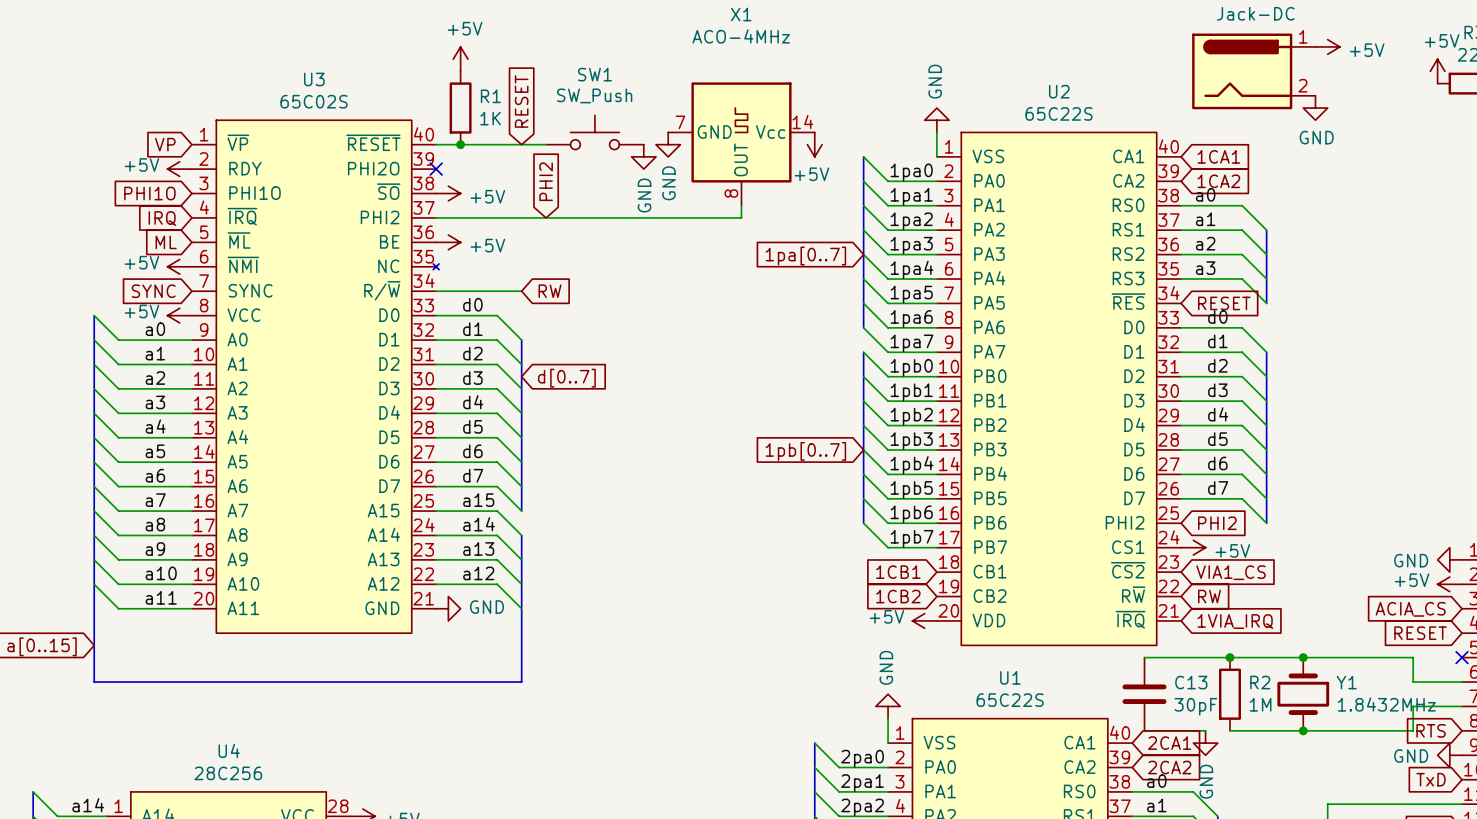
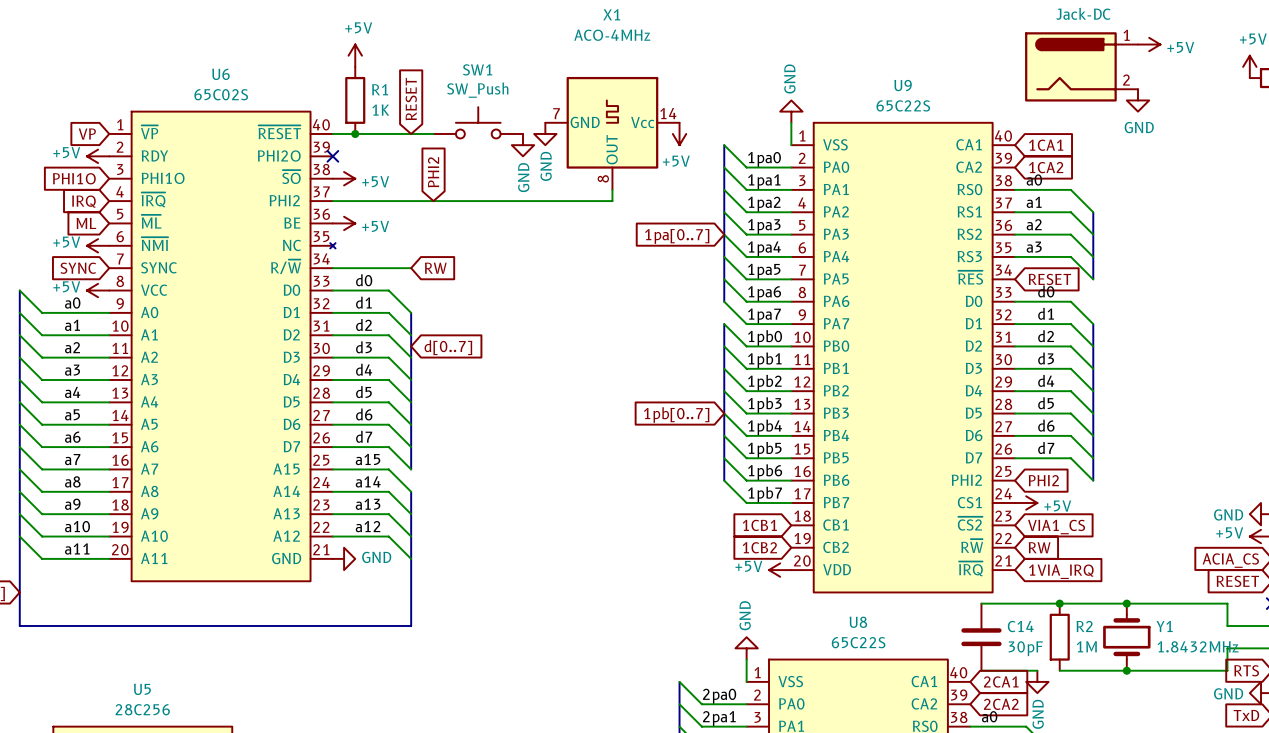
U3 name: U3 (314, 79) -> U6 (220, 74)
U2 name: U2 (1059, 91) -> U9 (903, 85)
U1 name: U1 (1010, 677) -> U8 (858, 622)
C13 name: C13 (1191, 682) -> C14 (1020, 626)
U4 name: U4 (229, 750) -> U5 (142, 689)

